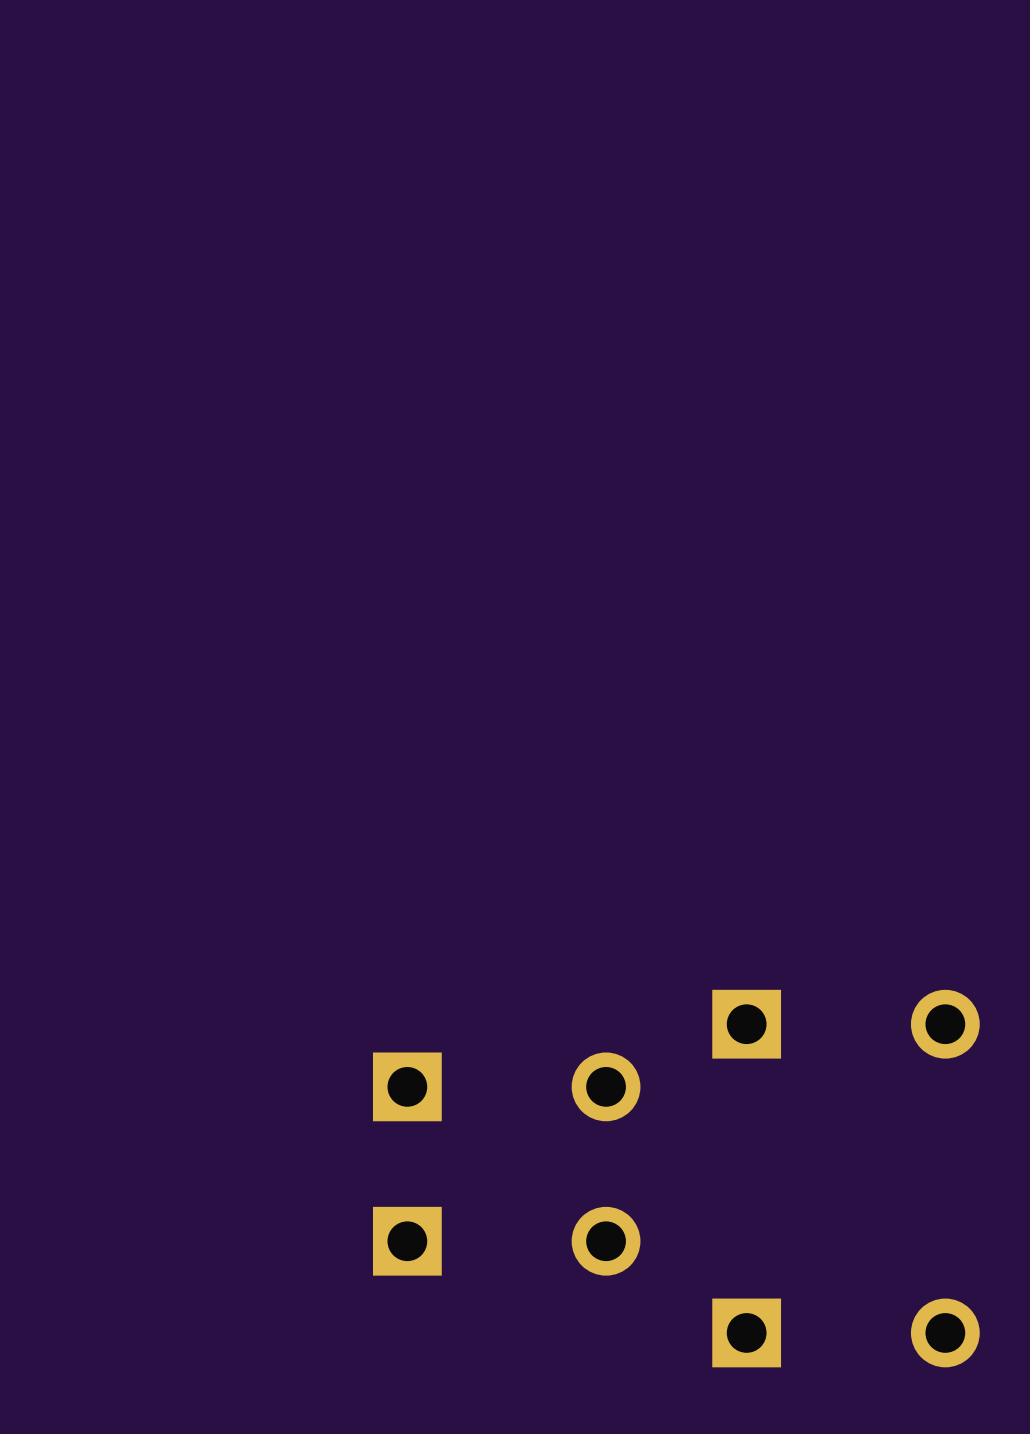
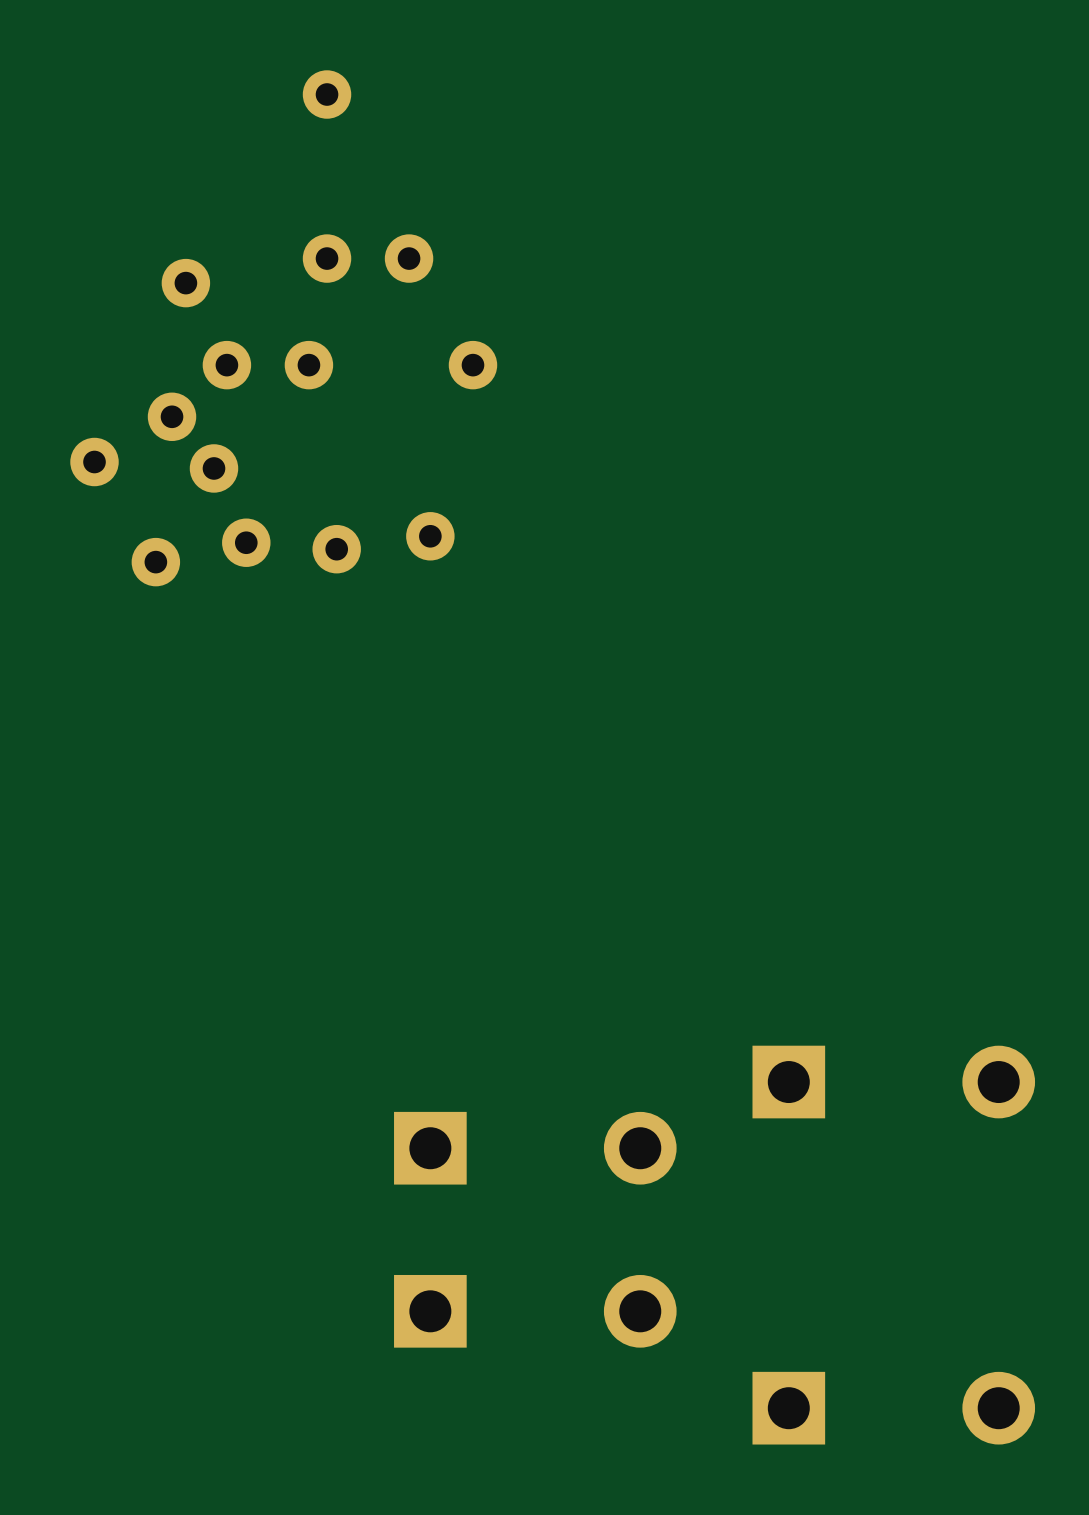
part: none -> (327, 94)
part: none -> (327, 258)
part: none -> (409, 258)
part: none -> (185, 283)
part: none -> (226, 365)
part: none -> (308, 365)
part: none -> (472, 365)
part: none -> (172, 416)
part: none -> (94, 462)
part: none -> (213, 468)
part: none -> (430, 536)
part: none -> (246, 542)
part: none -> (336, 549)
part: none -> (155, 562)

